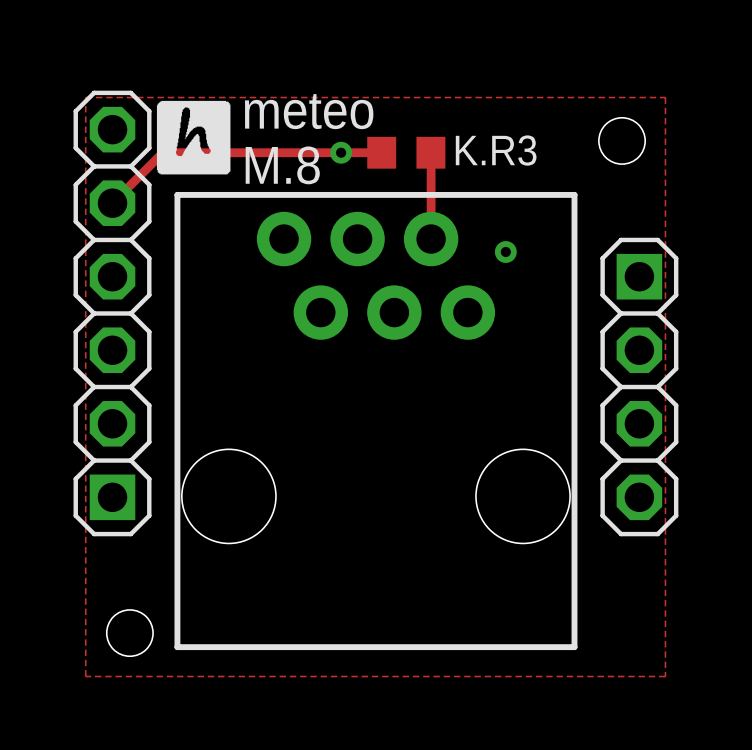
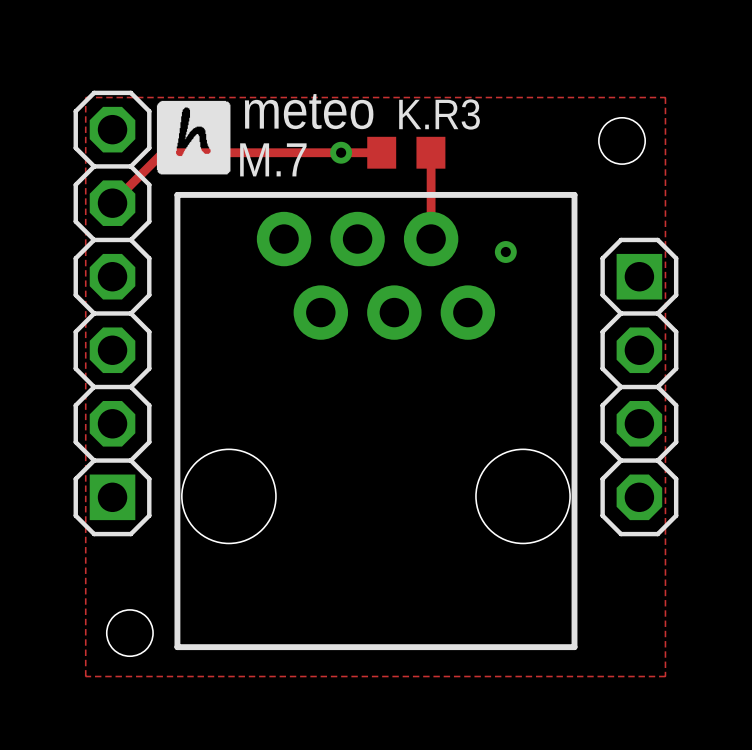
K.R3 name position: K.R3 (496, 150) -> K.R3 (439, 114)
text: M.8 (282, 165) -> M.7 (273, 159)

